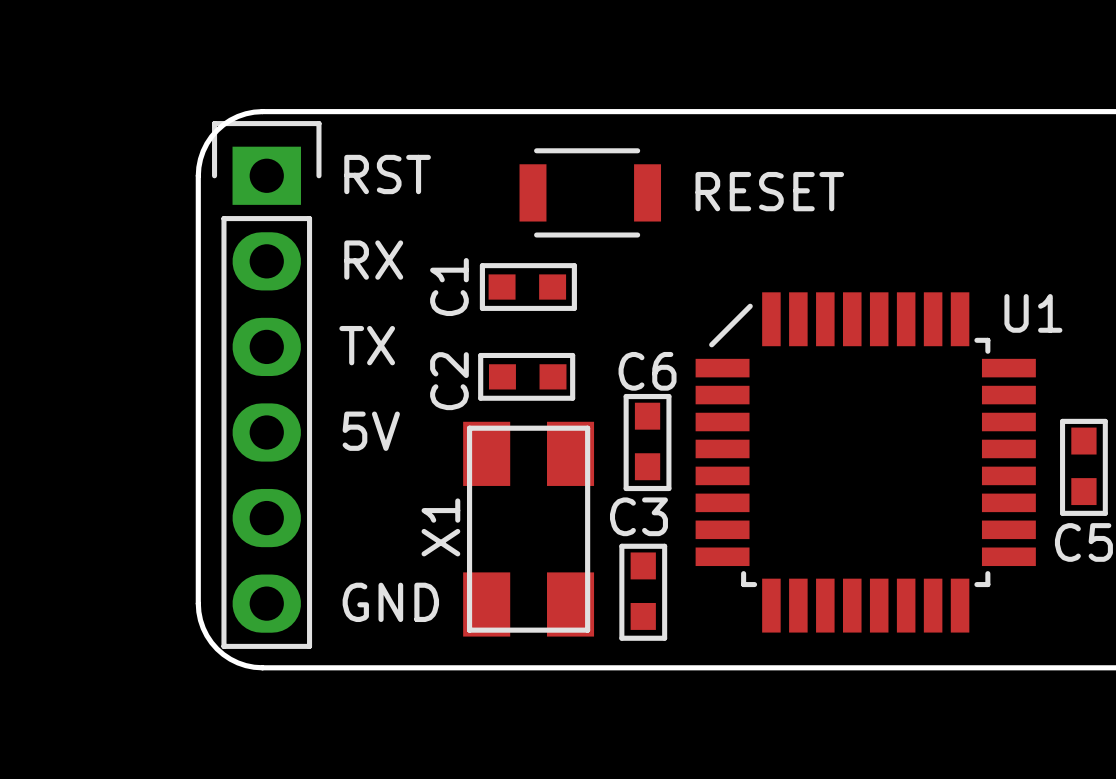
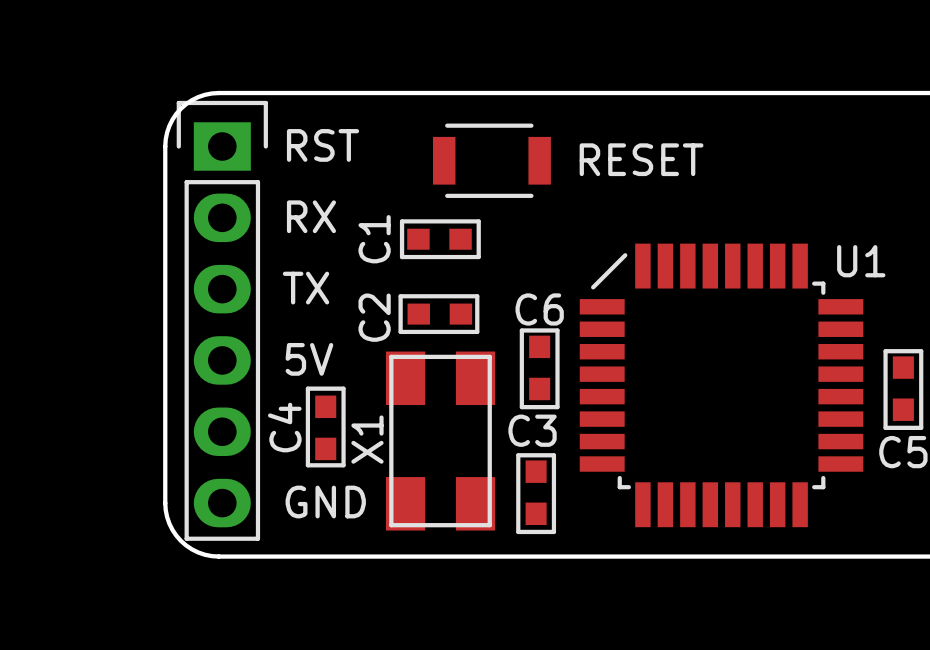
C4: none -> (325, 426)

